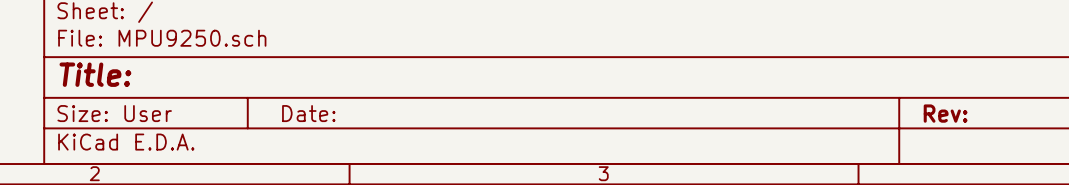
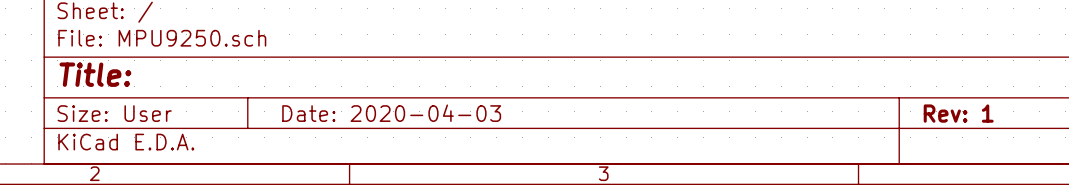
title block: Date: (308, 113) -> Date: 2020-04-03 (391, 113)
title block: Rev: (945, 113) -> Rev: 1 (958, 113)

